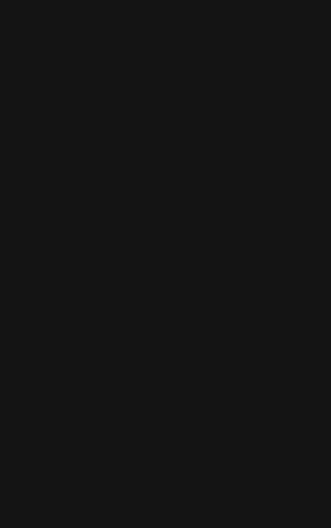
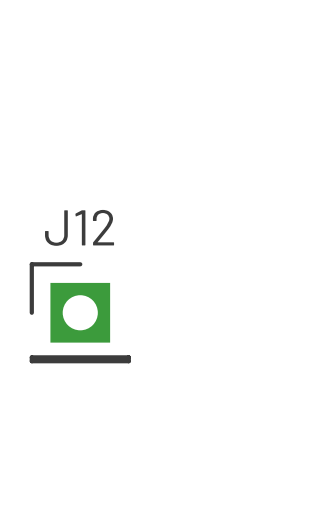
J12: none -> (80, 312)

